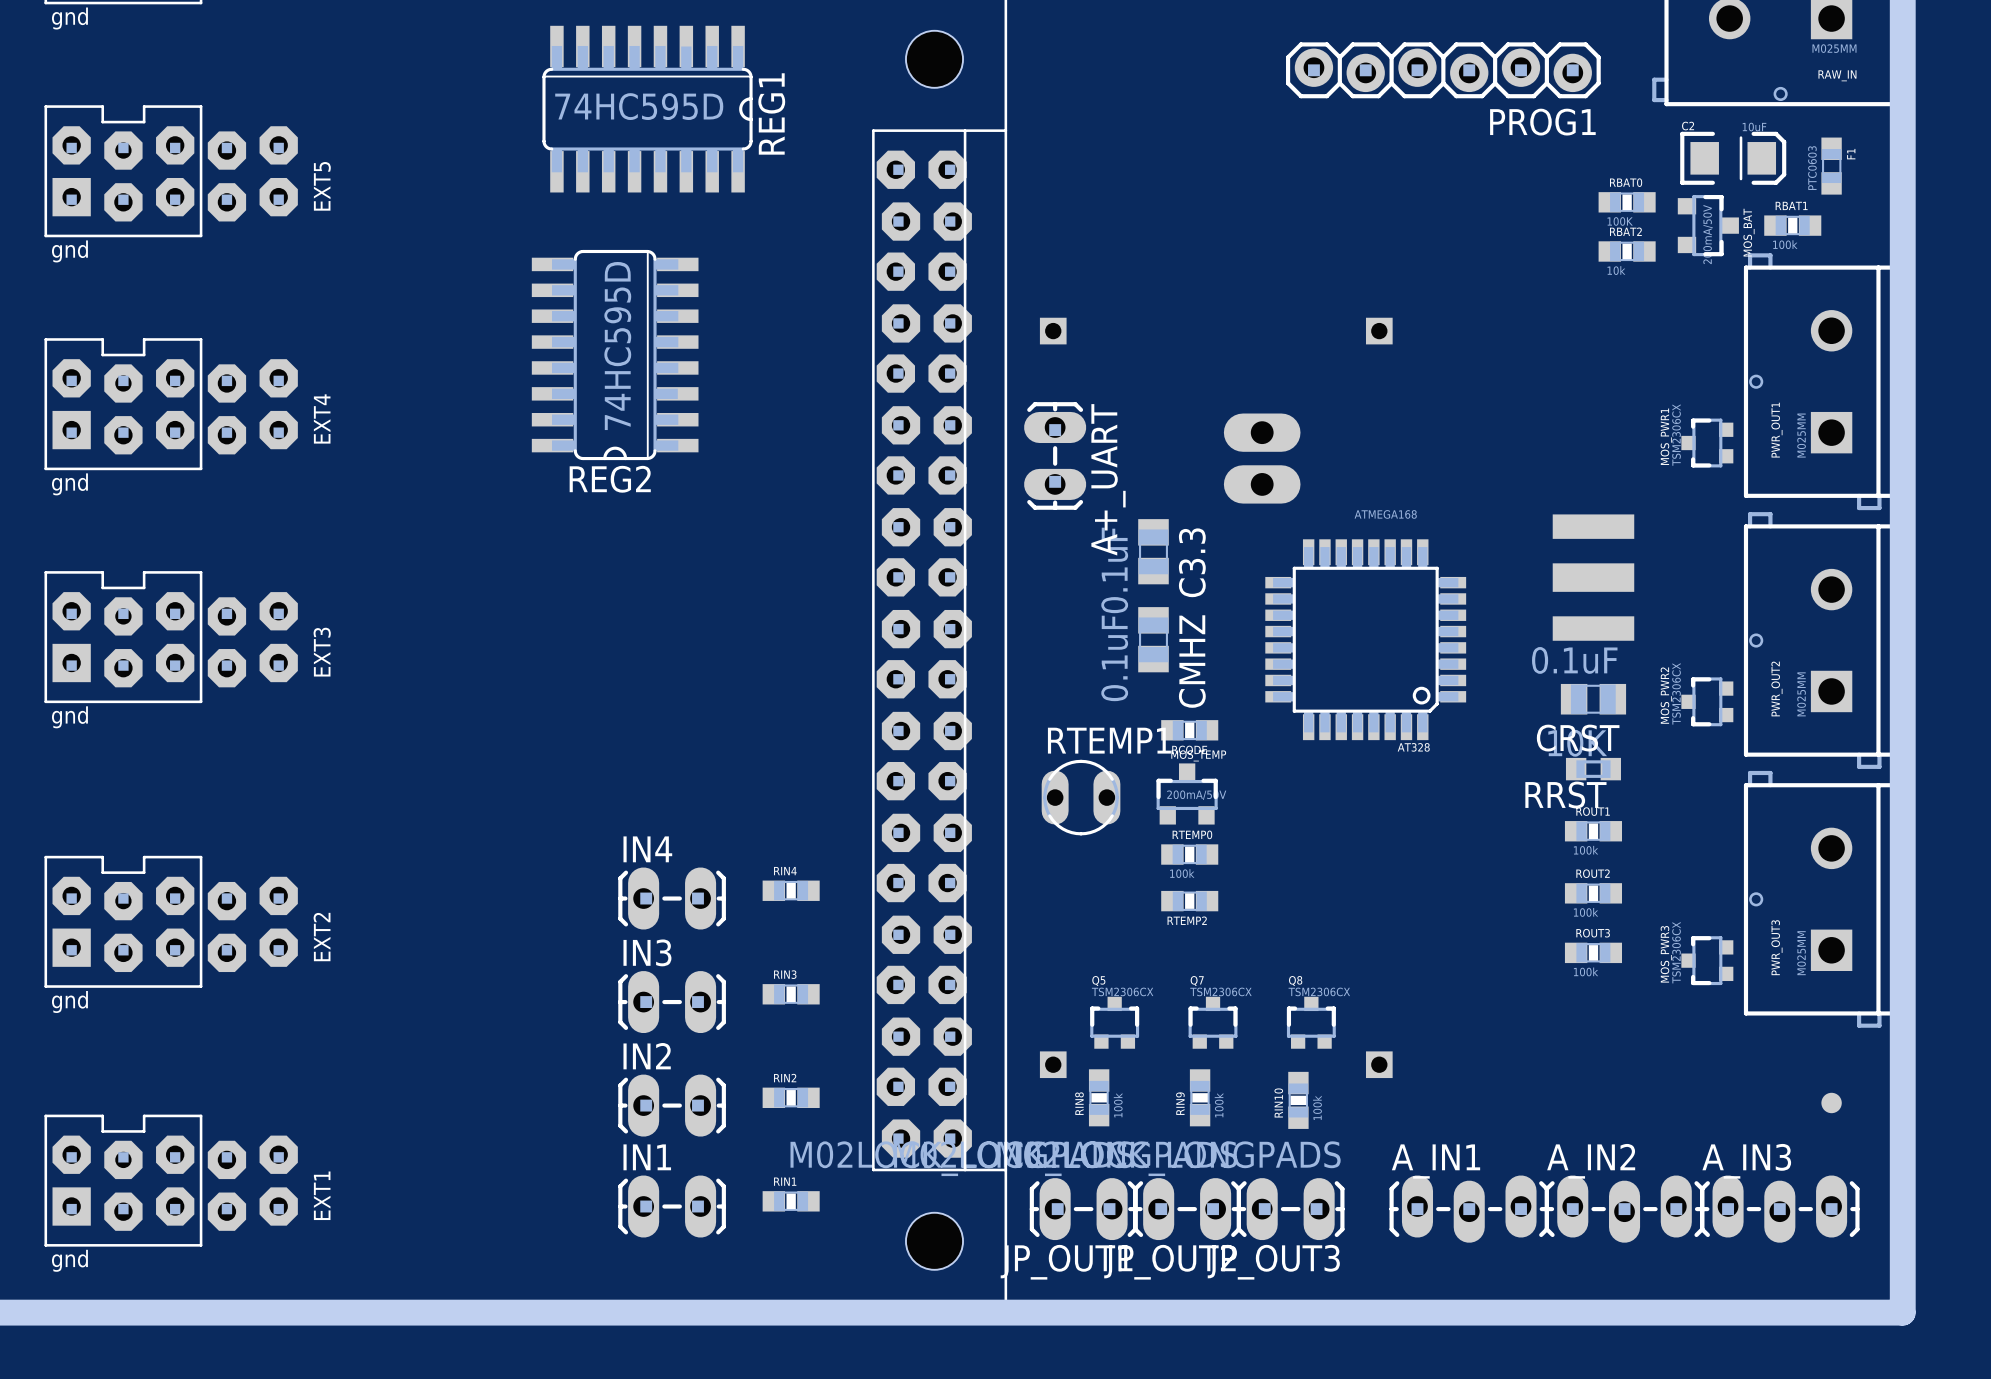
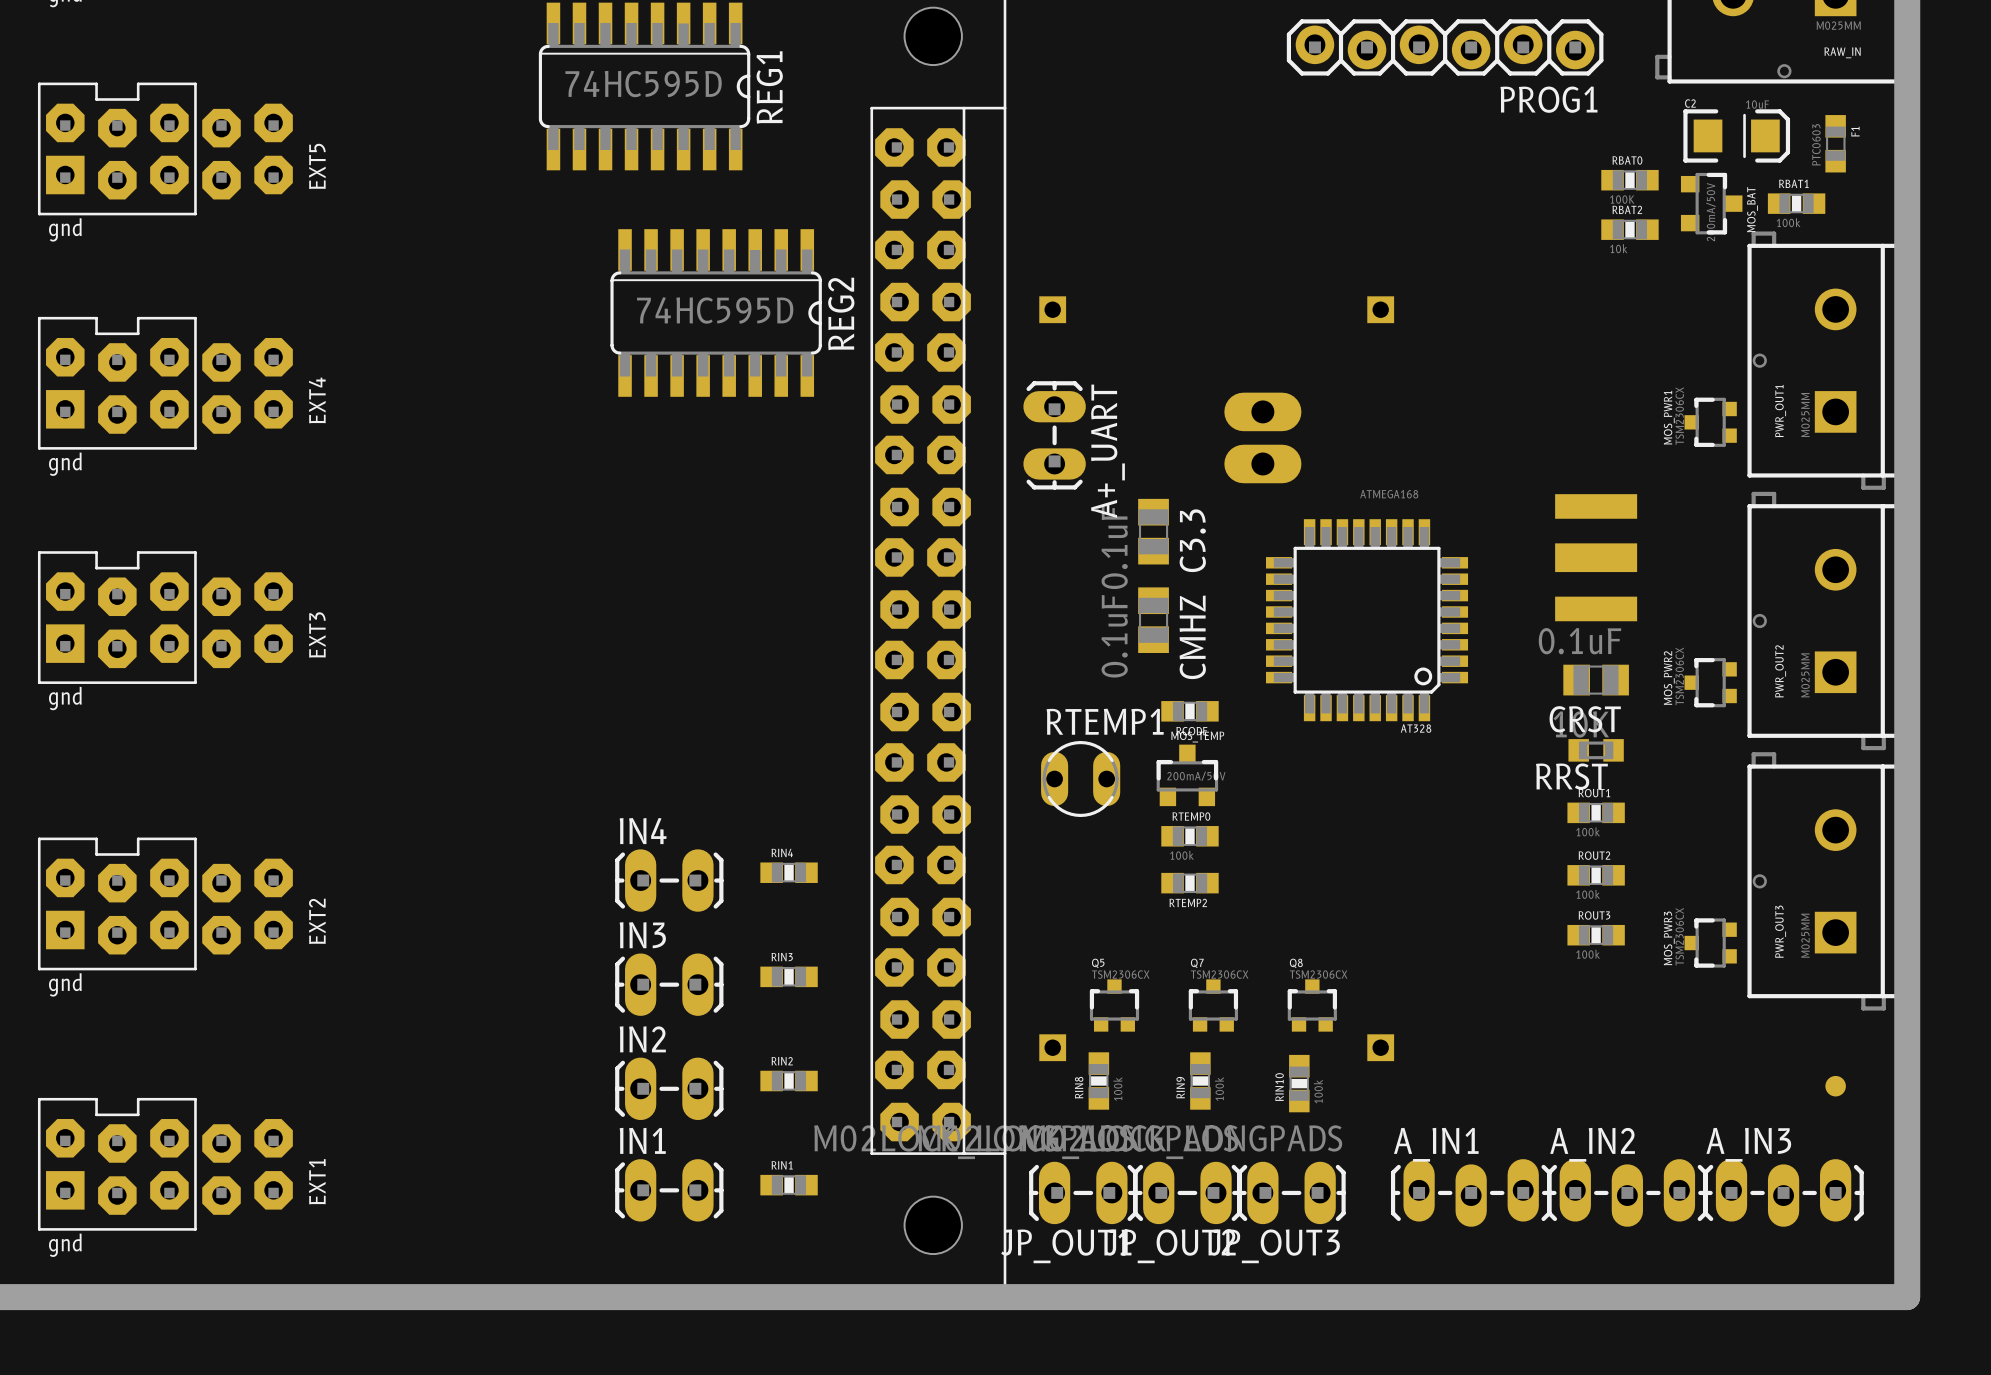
REG2 rotation: 0° (615, 355) -> 90° counterclockwise (716, 312)

